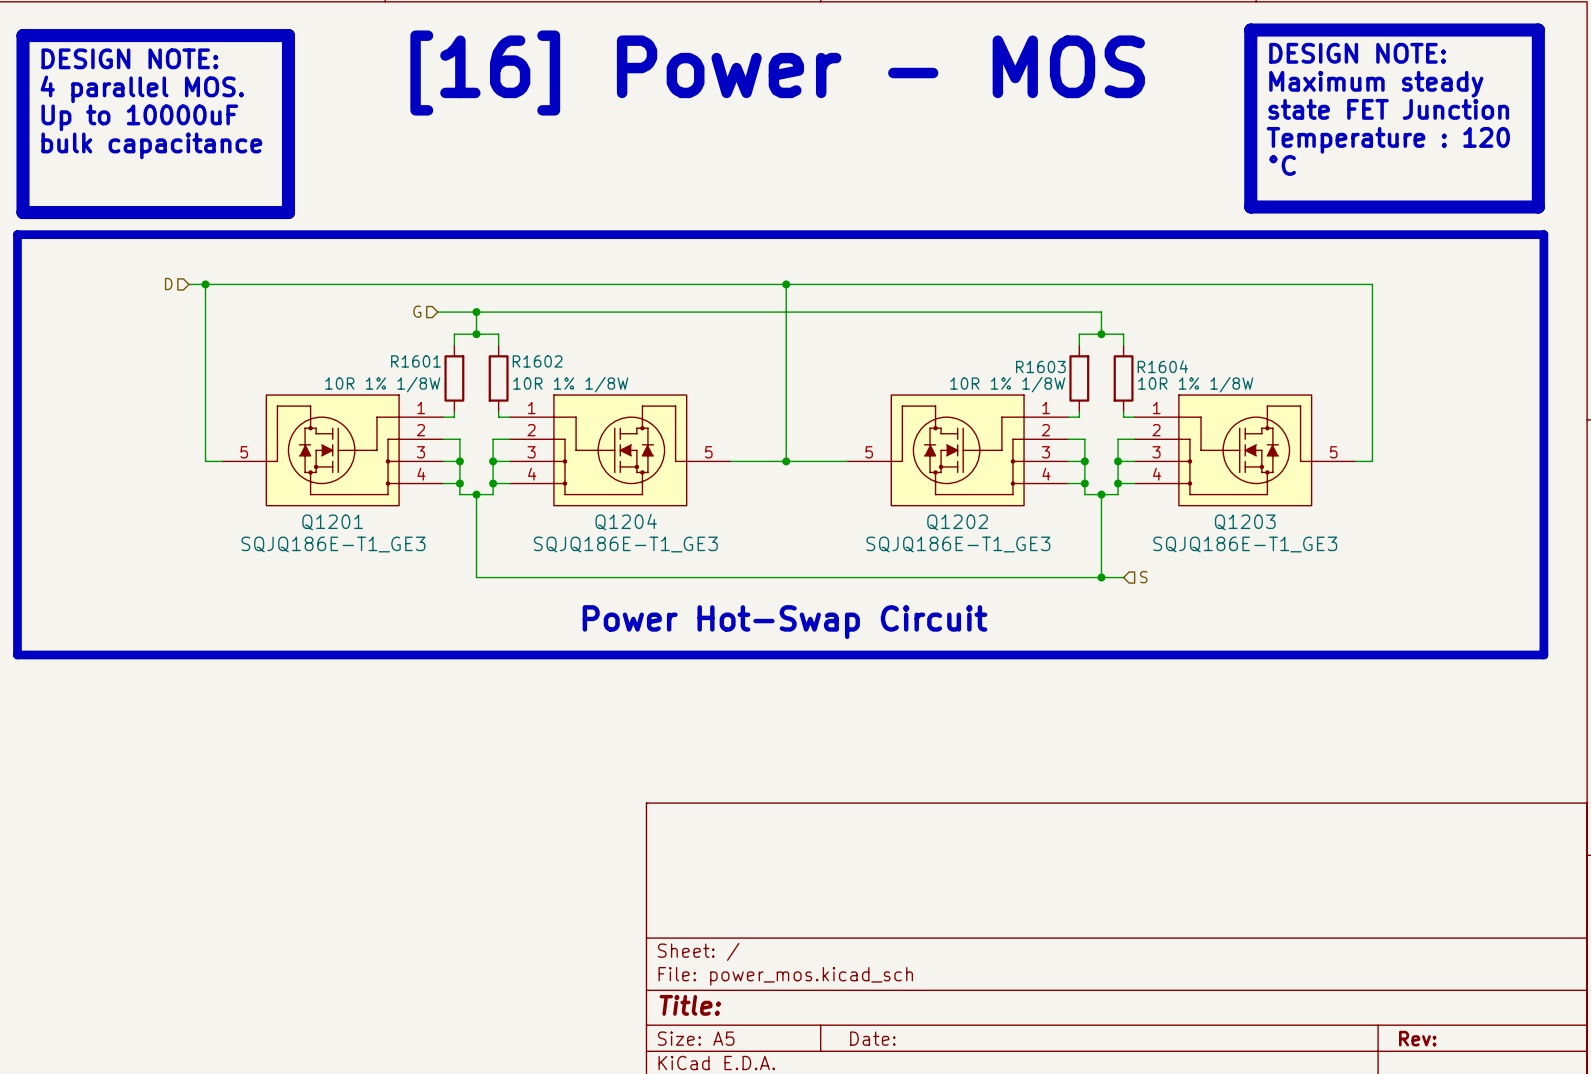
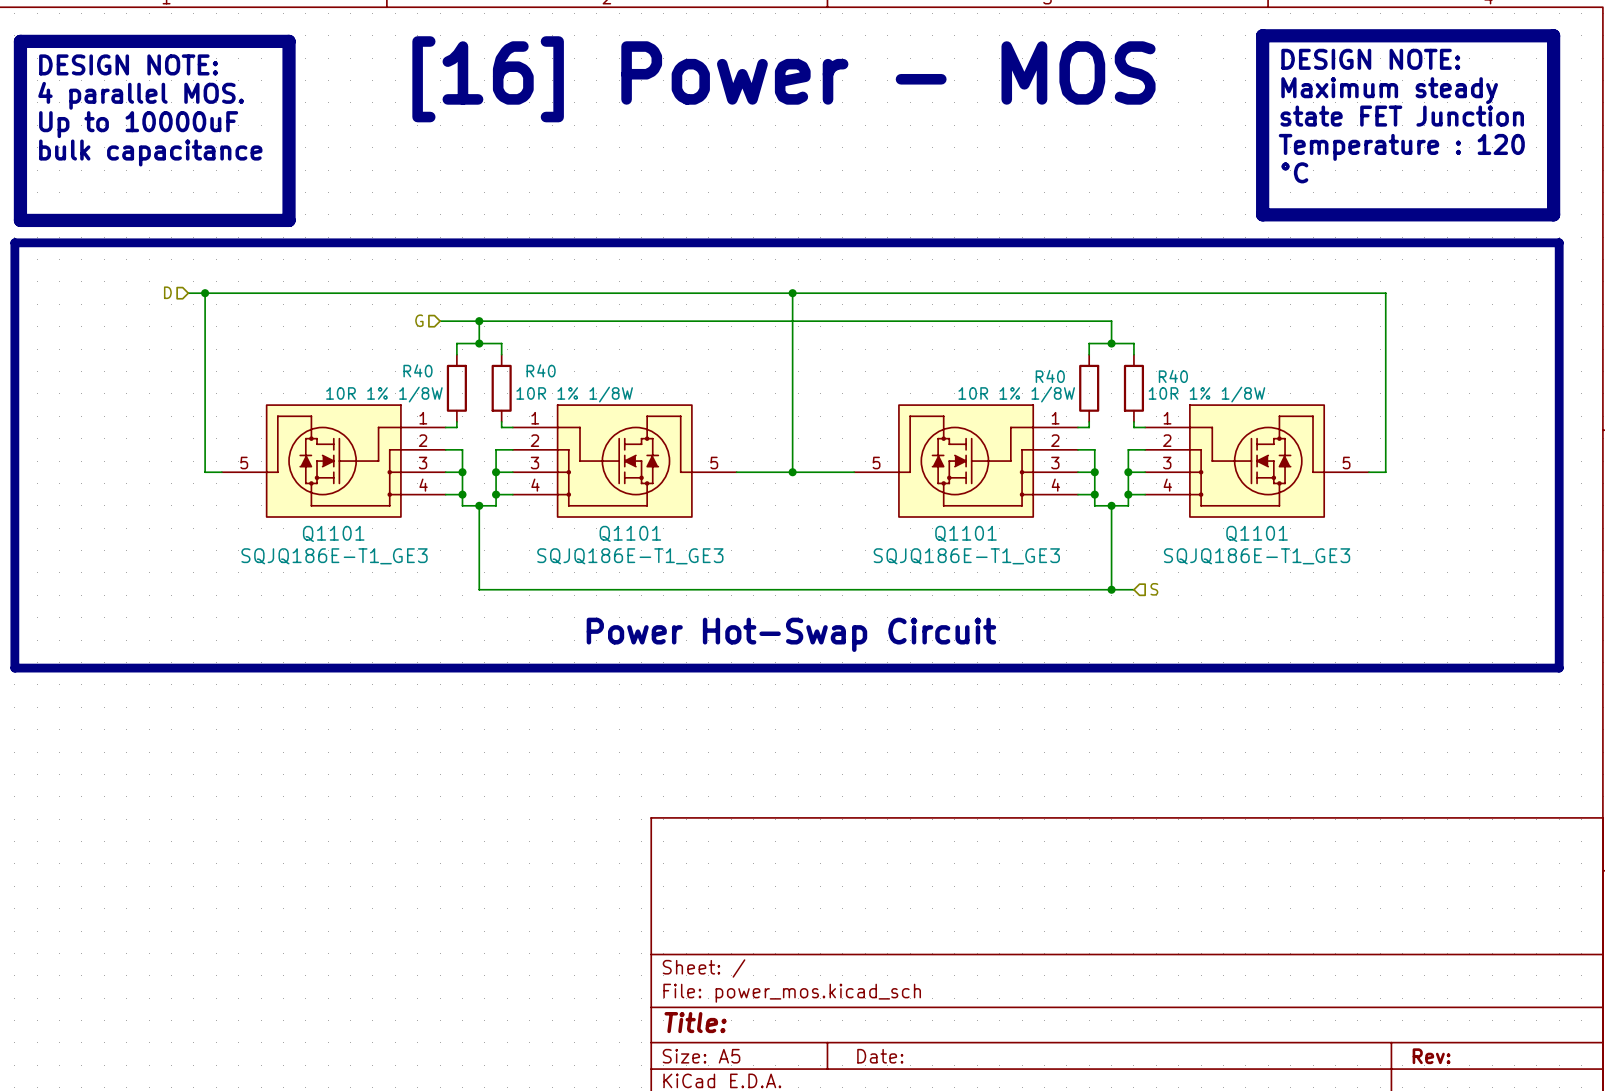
R1601 name: R1601 (415, 361) -> R40 (417, 370)
R1602 name: R1602 (537, 361) -> R40 (541, 370)
R1603 name: R1603 (1040, 366) -> R40 (1050, 376)
R1604 name: R1604 (1162, 366) -> R40 (1173, 376)
Q1201 name: Q1201 (332, 522) -> Q1101 (333, 533)
Q1204 name: Q1204 (626, 522) -> Q1101 (630, 533)
Q1202 name: Q1202 (957, 522) -> Q1101 (966, 533)
Q1203 name: Q1203 (1245, 522) -> Q1101 (1257, 533)

